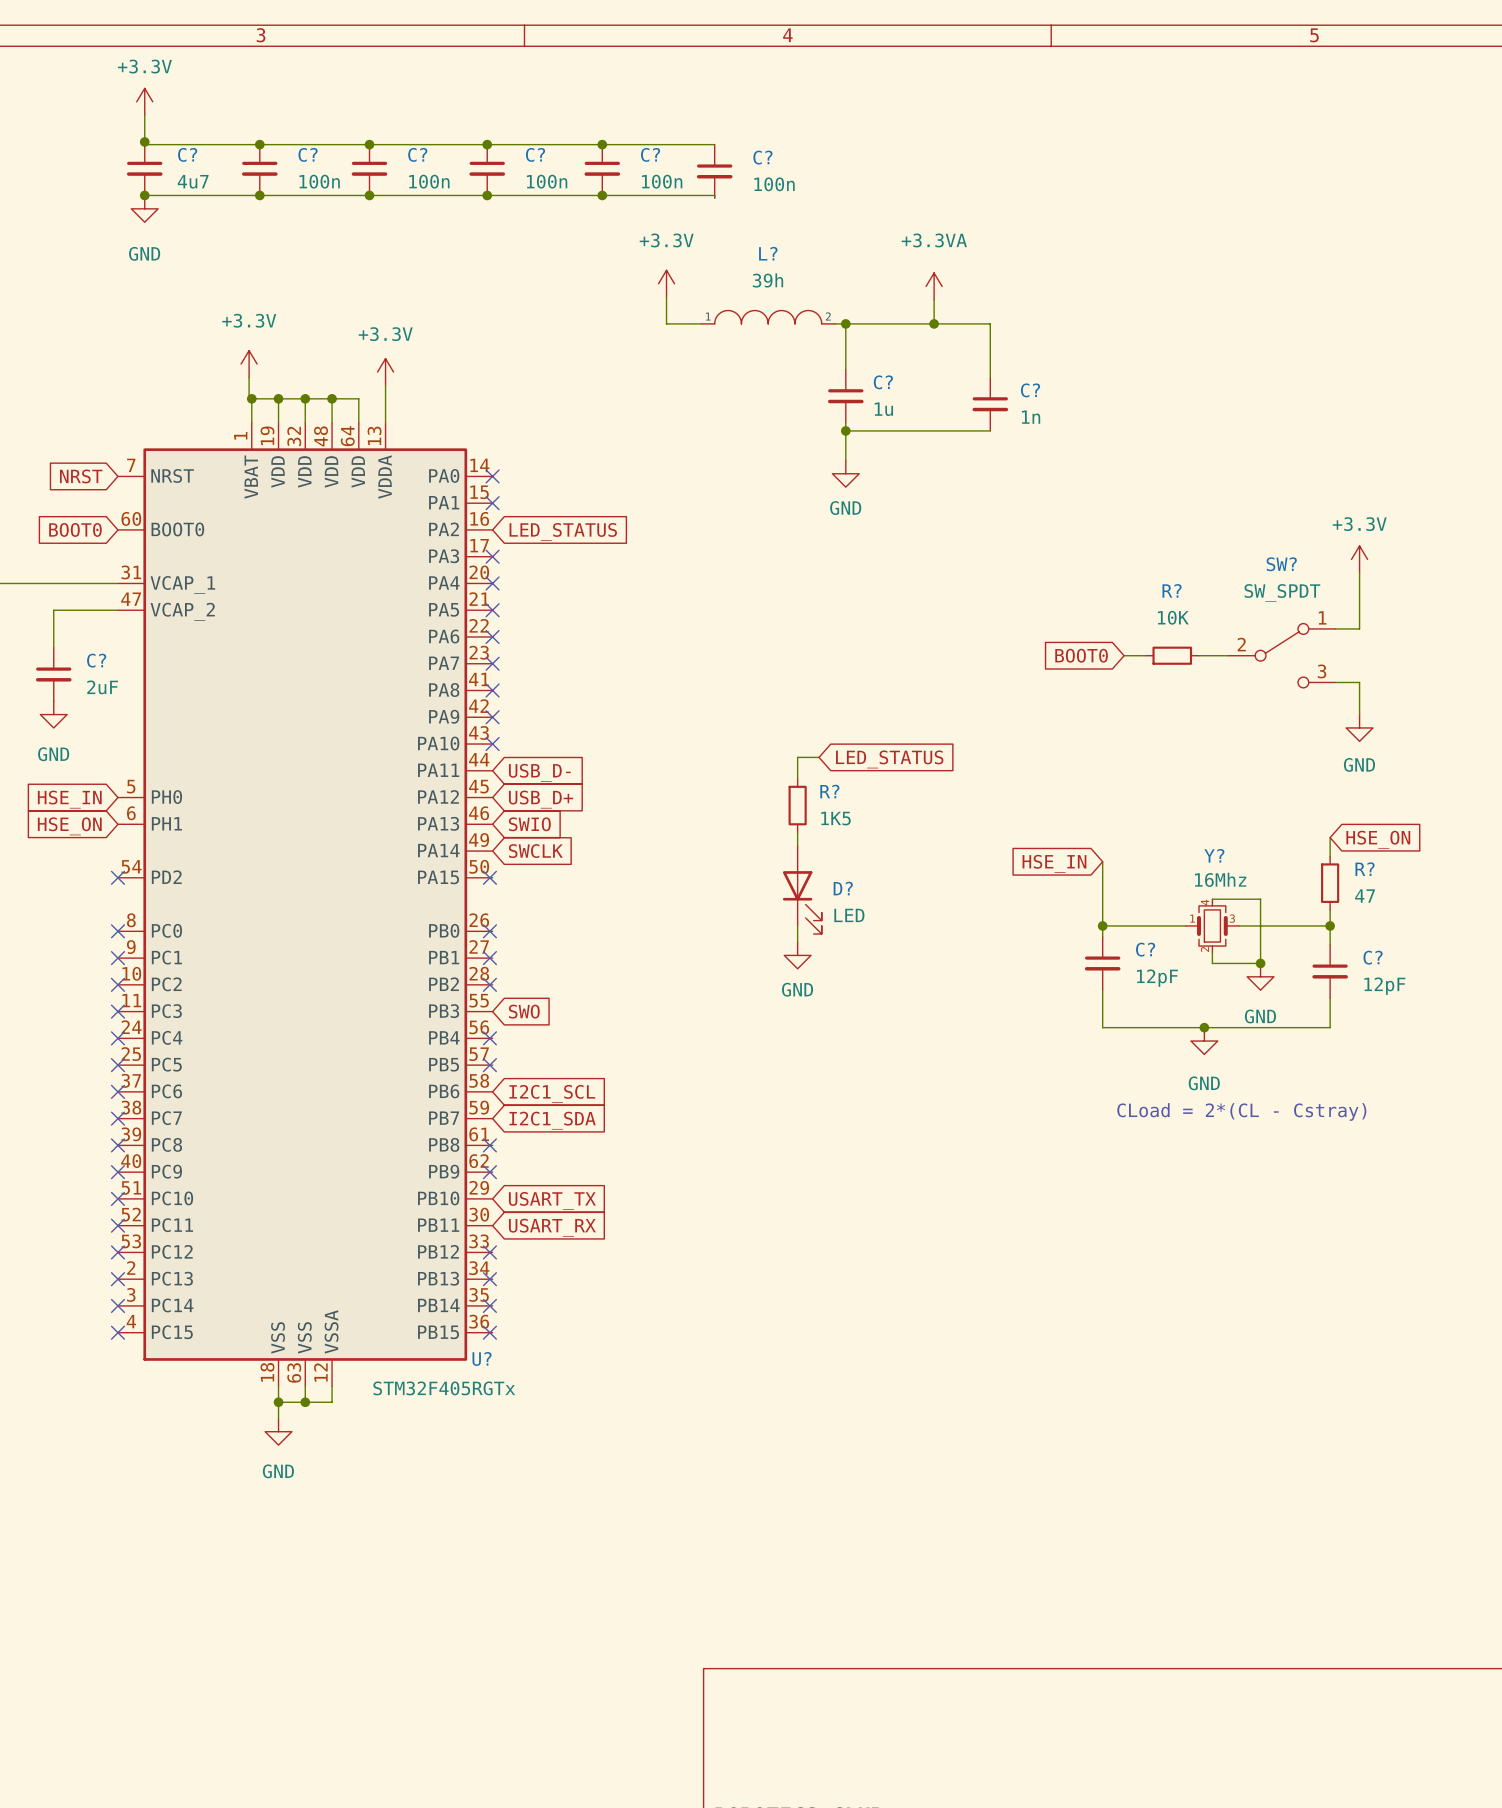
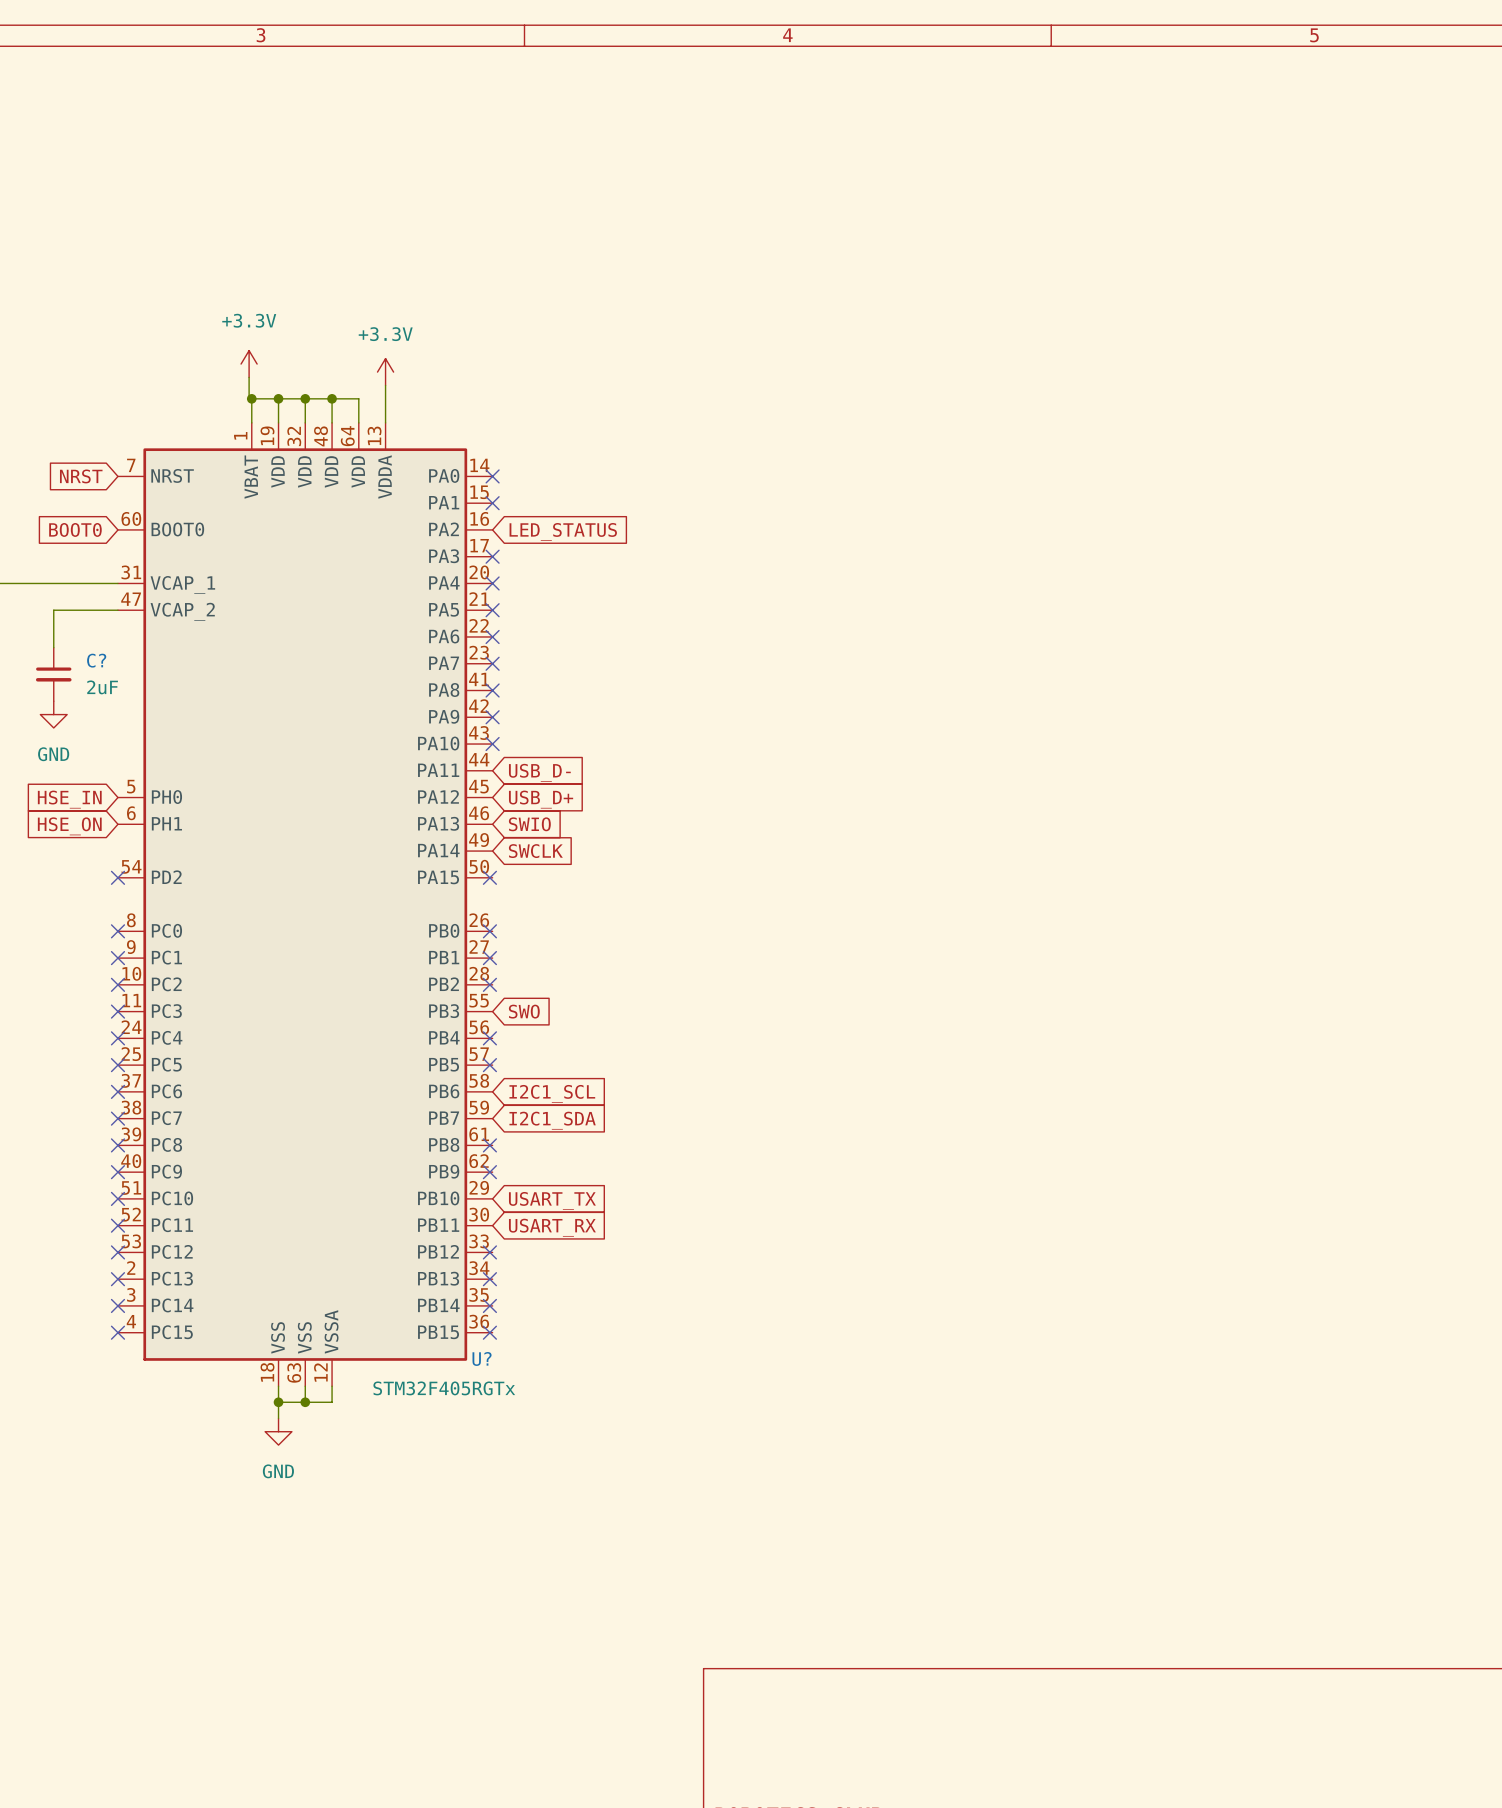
power symbol: +3.3V (144, 101) -> none
wire: (144, 115) (144, 144) (714, 144) -> none
junction: (144, 141) -> none
junction: (259, 144) -> none
junction: (369, 144) -> none
junction: (487, 144) -> none
junction: (602, 144) -> none
C?: 4u7 (144, 168) -> none
C?: 100n (259, 168) -> none
C?: 100n (369, 168) -> none
C?: 100n (487, 168) -> none
C?: 100n (602, 168) -> none
C?: 100n (714, 171) -> none
wire: (144, 195) (714, 195) (714, 198) -> none
junction: (144, 195) -> none
junction: (259, 195) -> none
junction: (369, 195) -> none
junction: (487, 195) -> none
junction: (602, 195) -> none
power symbol: GND (144, 208) -> none
power symbol: +3.3V (666, 283) -> none
power symbol: +3.3VA (934, 286) -> none
wire: (666, 297) (666, 323) (701, 323) -> none
wire: (934, 299) (934, 323) -> none
L?: 39h (768, 317) -> none
wire: (835, 323) (990, 323) (990, 377) -> none
wire: (845, 323) (845, 369) -> none
junction: (845, 323) -> none
junction: (934, 323) -> none
C?: 1u (845, 396) -> none
C?: 1n (990, 404) -> none
wire: (845, 422) (845, 460) -> none
wire: (845, 430) (990, 430) -> none
junction: (845, 430) -> none
power symbol: GND (845, 473) -> none
power symbol: +3.3V (1359, 559) -> none
wire: (1359, 572) (1359, 628) (1335, 628) -> none
global label: BOOT0 (1081, 655) -> none
wire: (1124, 655) (1145, 655) -> none
R?: 10K (1172, 655) -> none
wire: (1199, 655) (1228, 655) -> none
SW?: SW_SPDT (1281, 655) -> none
wire: (1335, 682) (1359, 682) (1359, 714) -> none
power symbol: GND (1359, 727) -> none
wire: (819, 757) (797, 757) (797, 778) -> none
global label: LED_STATUS (889, 759) -> none
R?: 1K5 (797, 805) -> none
wire: (797, 832) (797, 845) -> none
wire: (1330, 837) (1330, 856) -> none
global label: HSE_ON (1378, 839) -> none
wire: (1102, 861) (1102, 936) -> none
global label: HSE_IN (1054, 863) -> none
R?: 47 (1330, 883) -> none
D?: LED (802, 889) -> none
wire: (1212, 899) (1260, 899) (1260, 963) (1212, 963) (1212, 952) -> none
wire: (1330, 909) (1330, 944) -> none
wire: (797, 925) (797, 942) -> none
wire: (1102, 925) (1185, 925) -> none
junction: (1102, 925) -> none
Y?: 16Mhz (1212, 925) -> none
wire: (1239, 925) (1330, 925) -> none
junction: (1330, 925) -> none
power symbol: GND (797, 955) -> none
C?: 12pF (1102, 963) -> none
junction: (1260, 963) -> none
C?: 12pF (1330, 971) -> none
power symbol: GND (1260, 976) -> none
wire: (1102, 990) (1102, 1027) (1330, 1027) (1330, 998) -> none
junction: (1204, 1027) -> none
power symbol: GND (1204, 1041) -> none
text: CLoad = 2*(CL - Cstray) (1241, 1111) -> none

